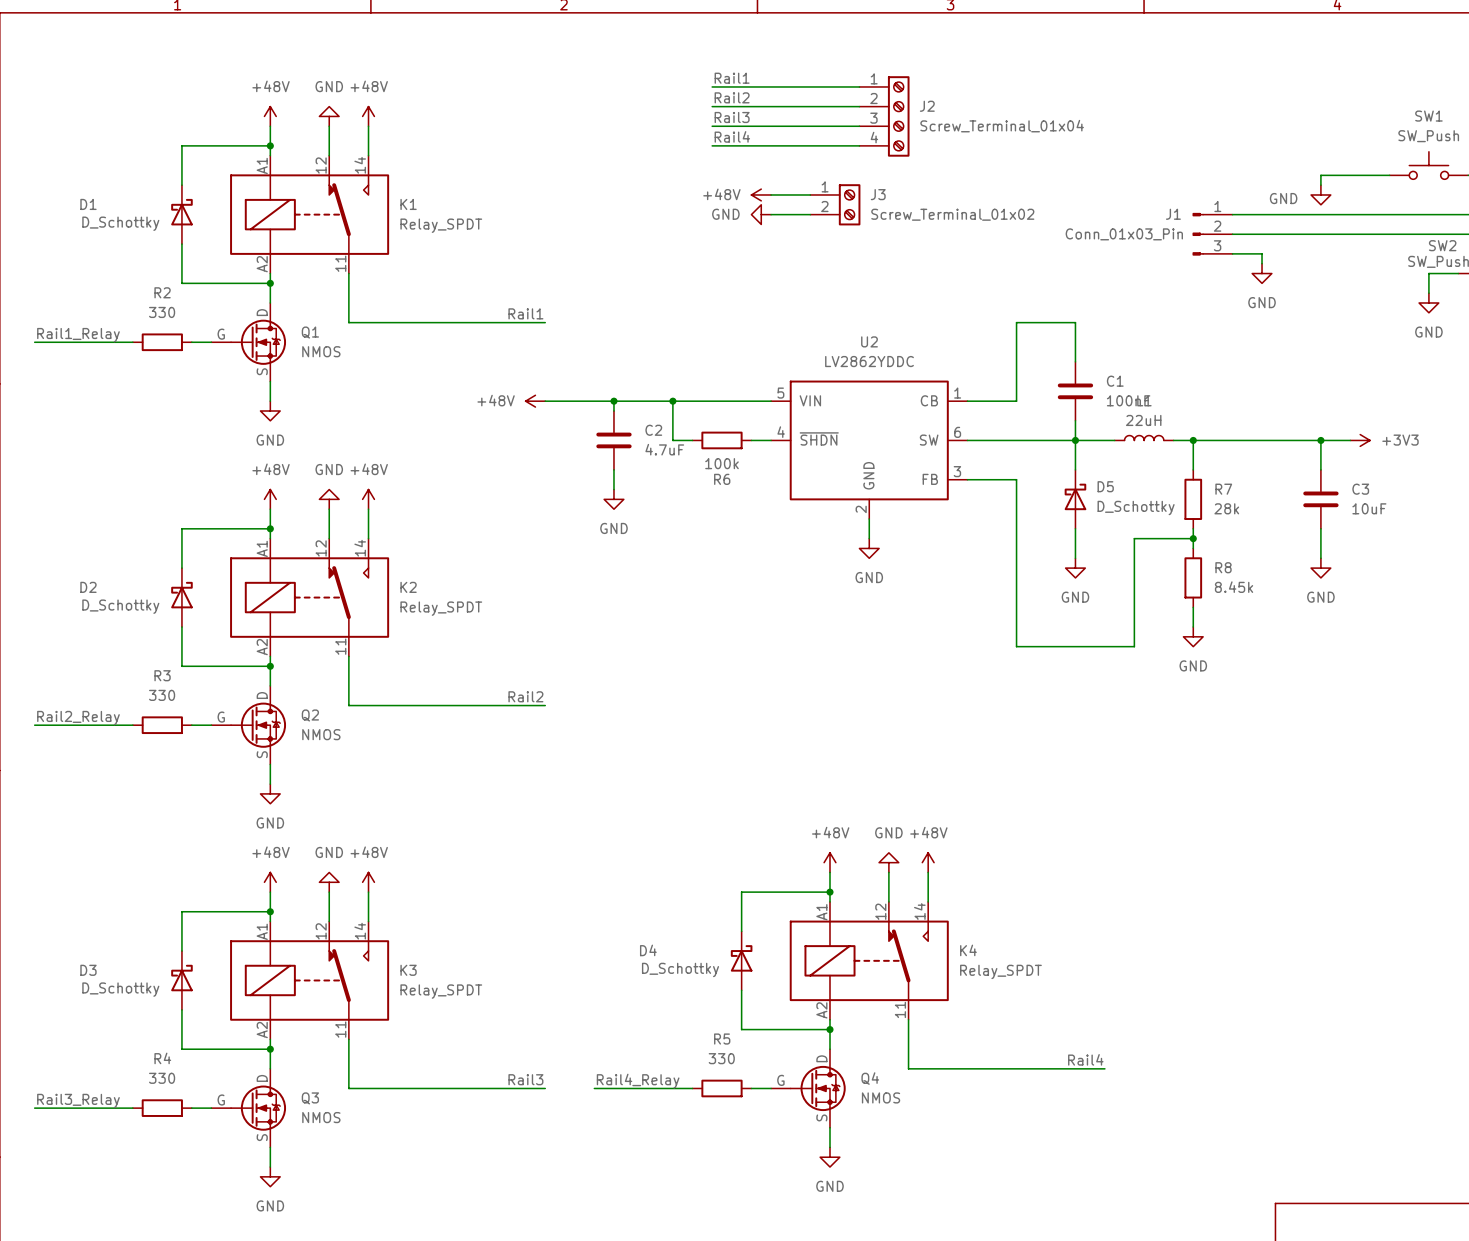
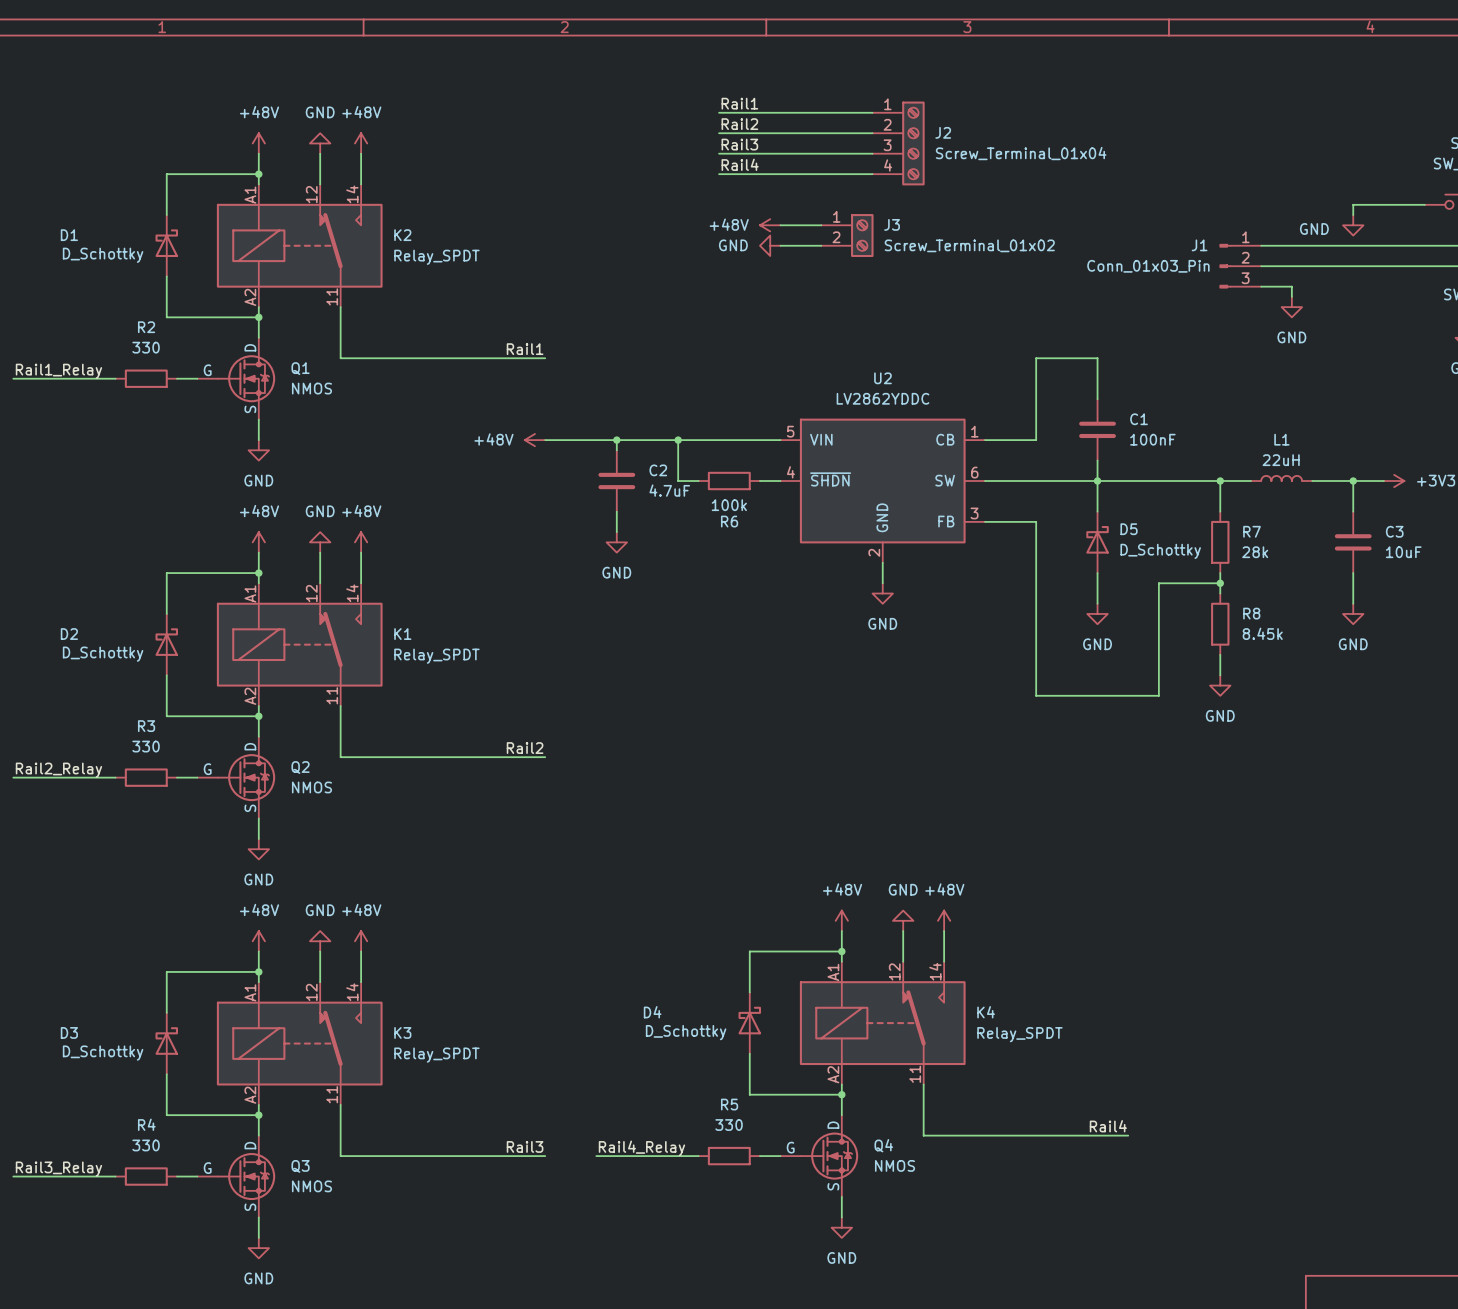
K1 name: K1 (408, 204) -> K2 (402, 235)
L1 position: (1144, 438) -> (1281, 478)
wire: (1222, 440) (1281, 440) -> (1138, 481) (1199, 481)
K2 name: K2 (408, 587) -> K1 (402, 634)

